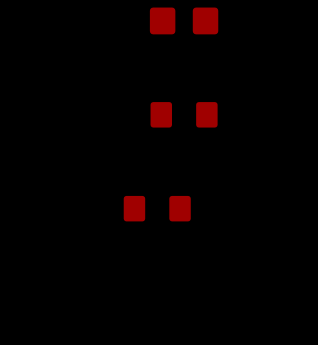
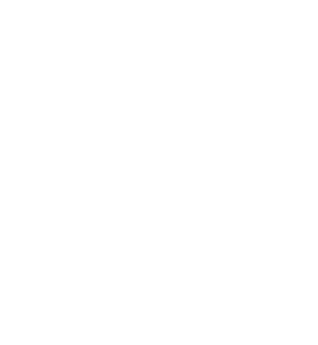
part: (184, 20) -> none
part: (184, 114) -> none
part: (157, 208) -> none

